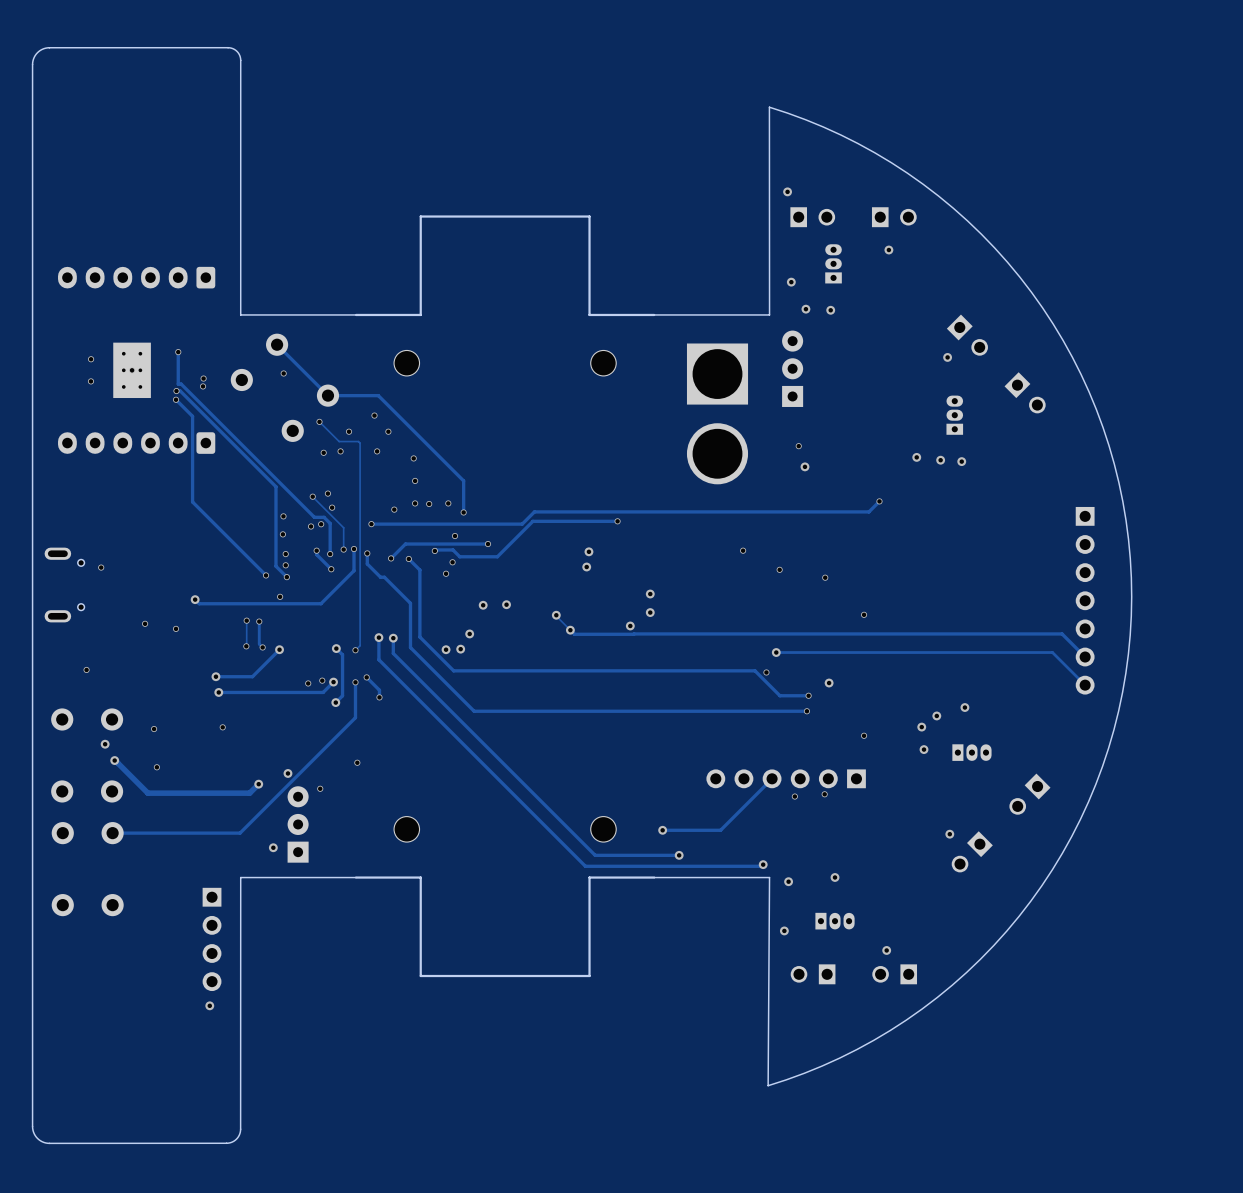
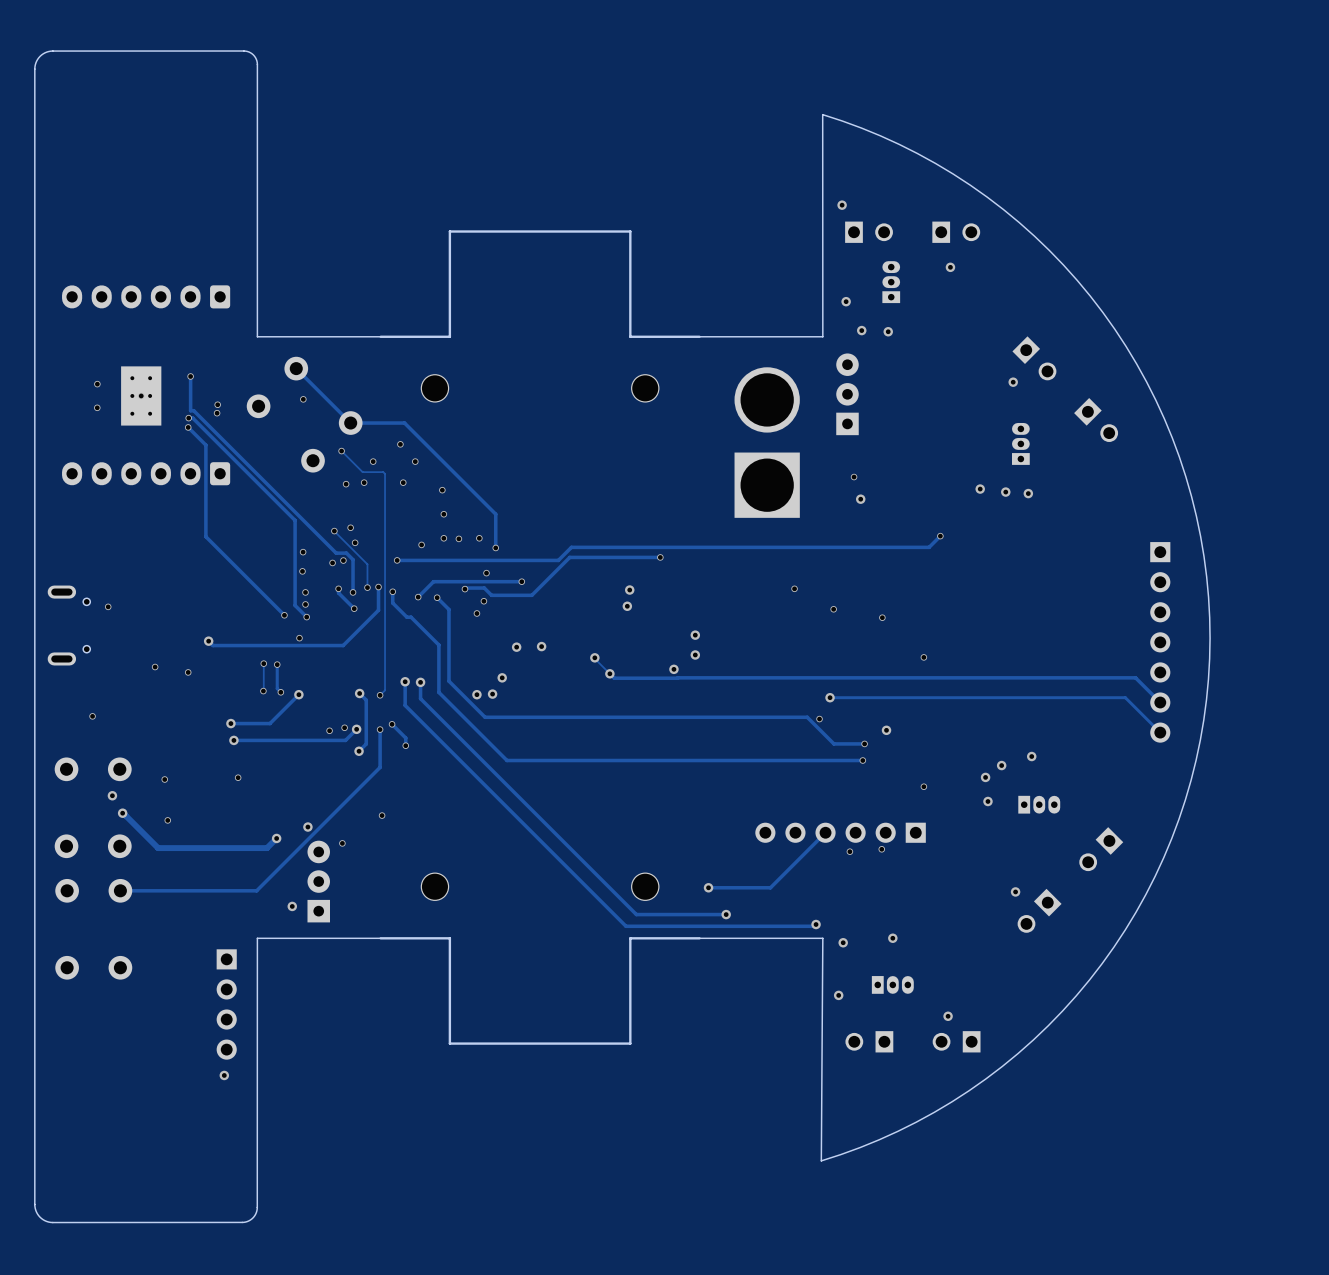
part rotation: 0° (717, 413) -> 180° (767, 442)

